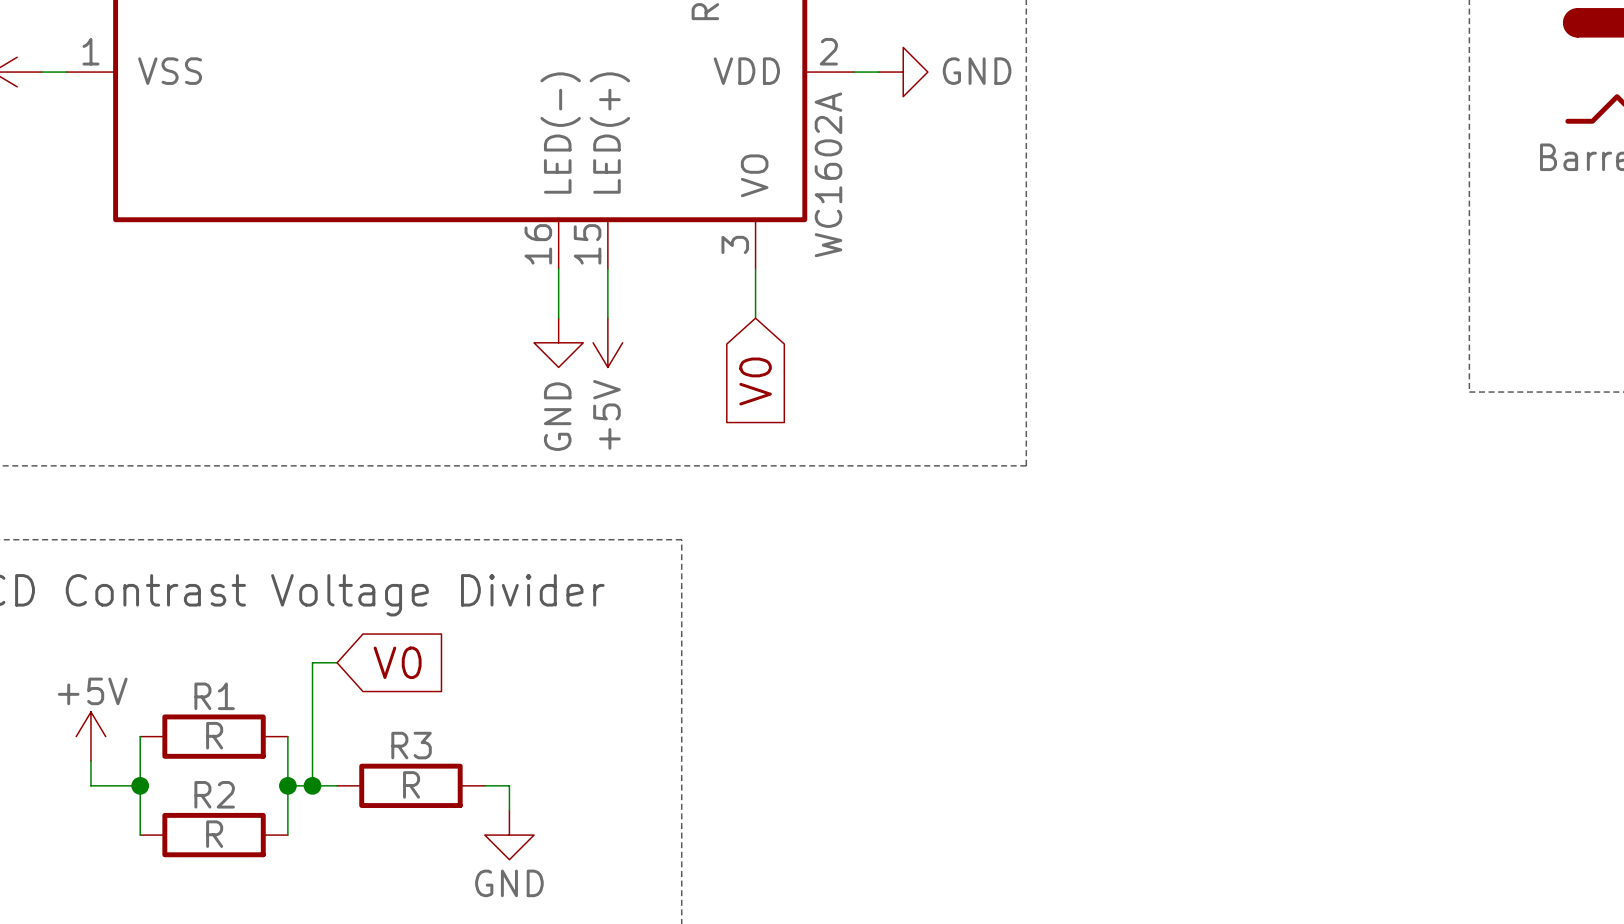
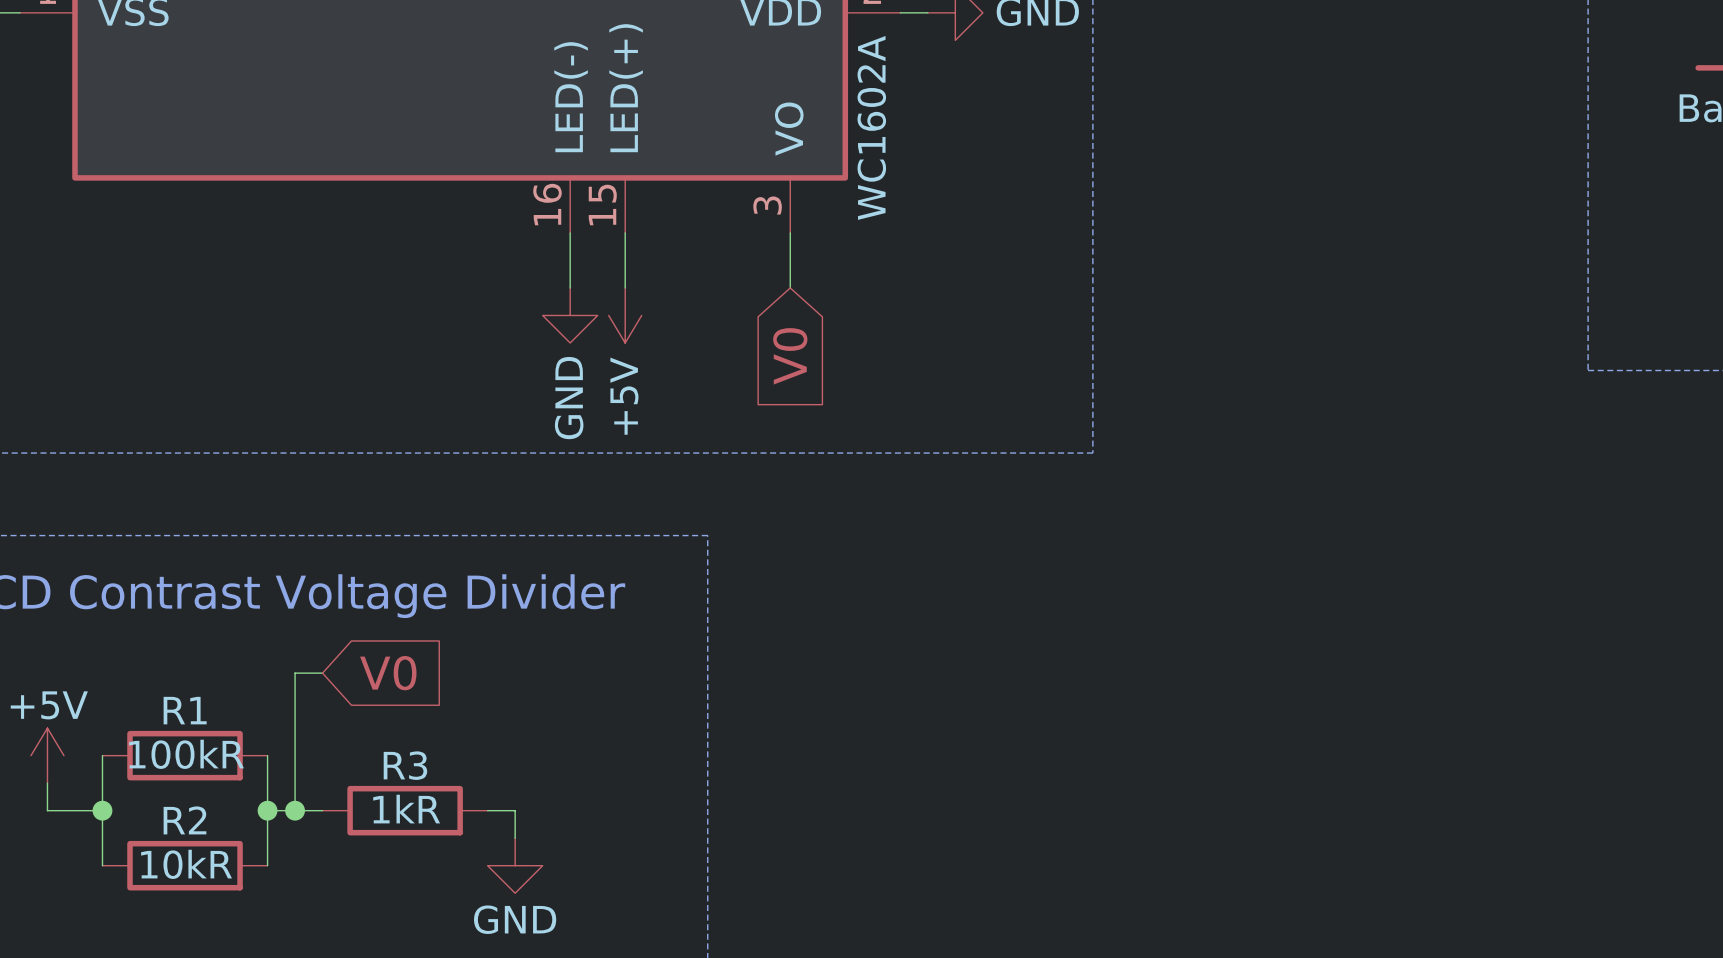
R1 value: R (214, 735) -> 100kR (186, 754)
R3 value: R (411, 784) -> 1kR (406, 809)
R2 value: R (214, 834) -> 10kR (186, 864)

